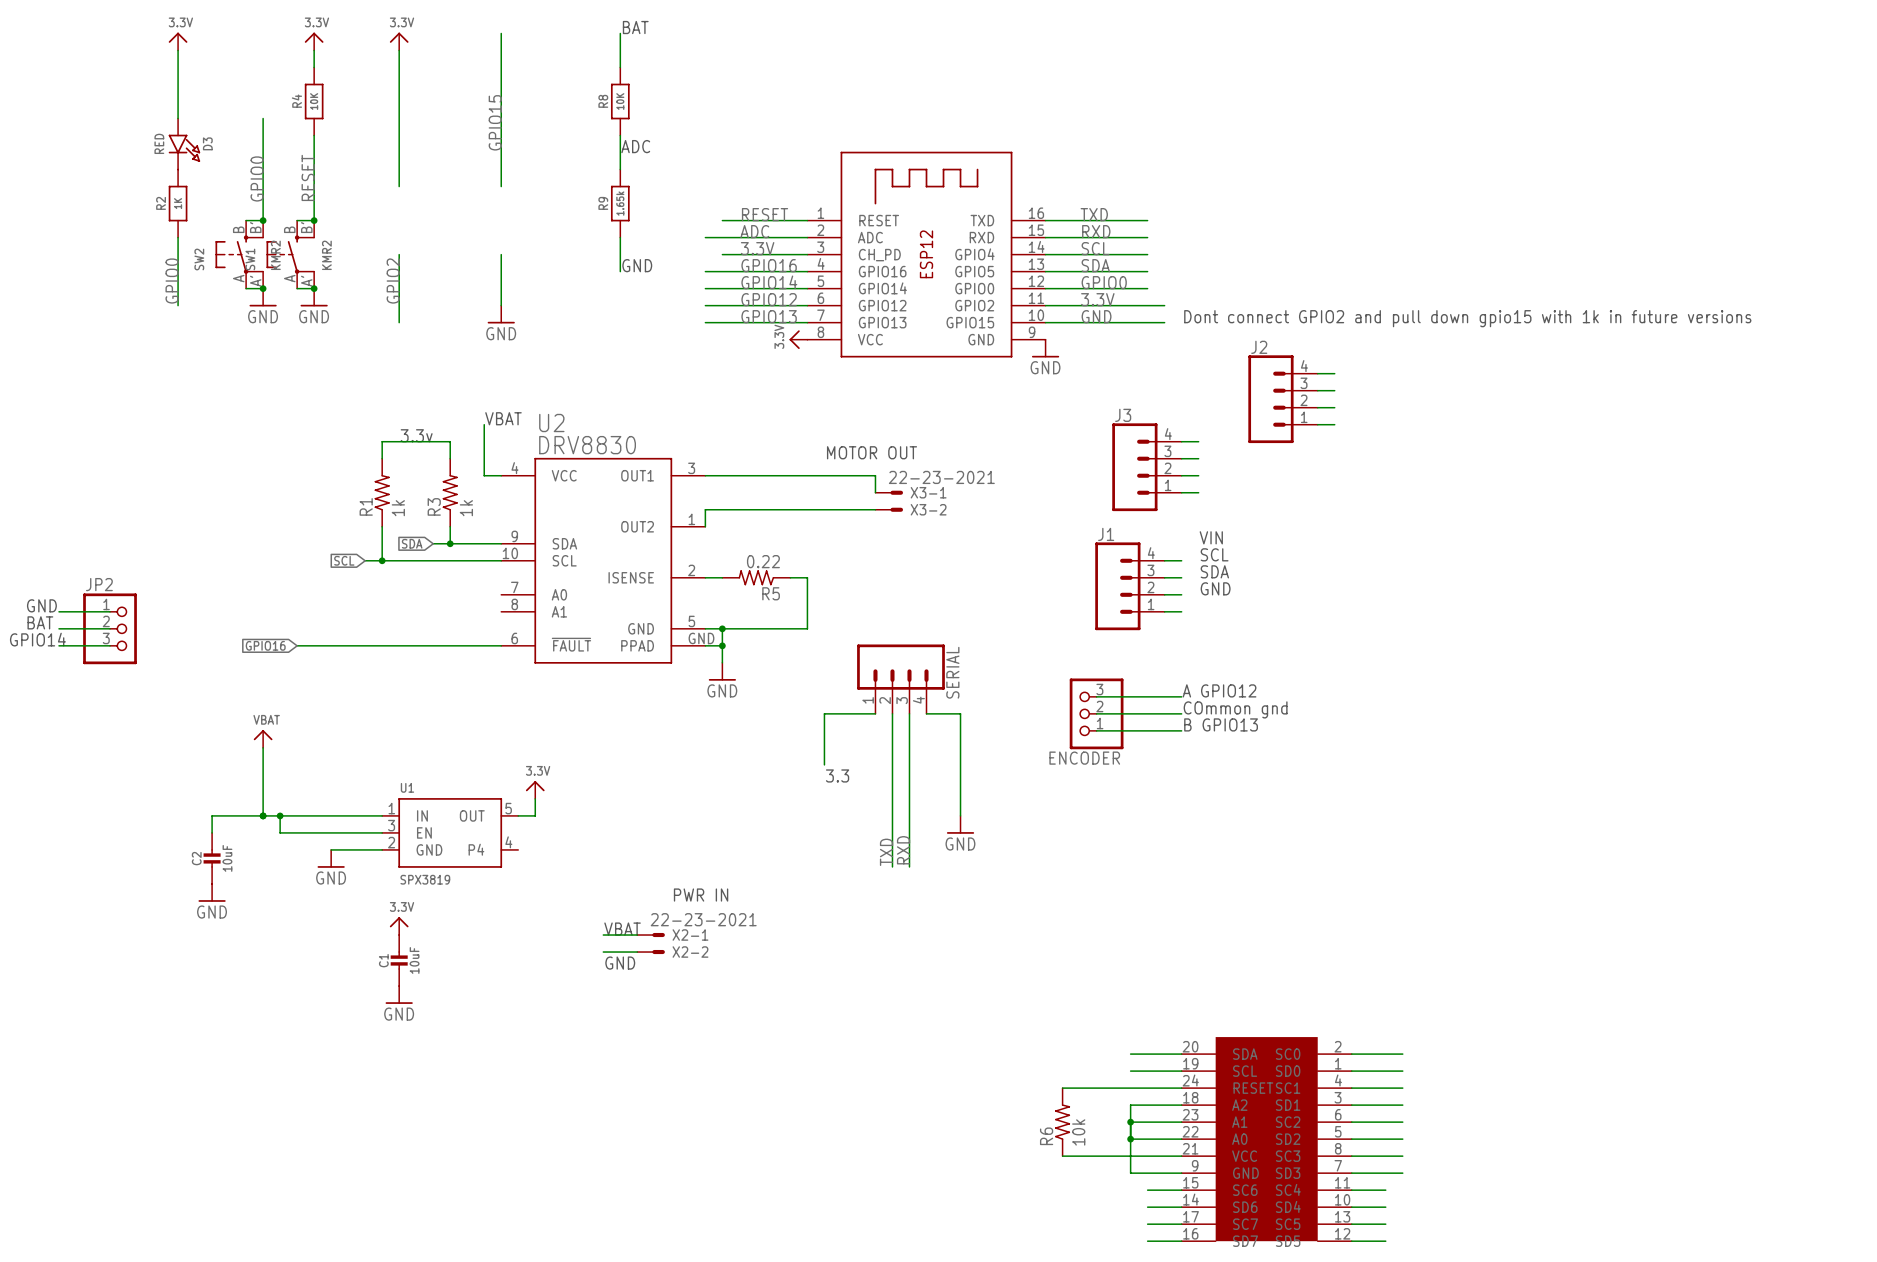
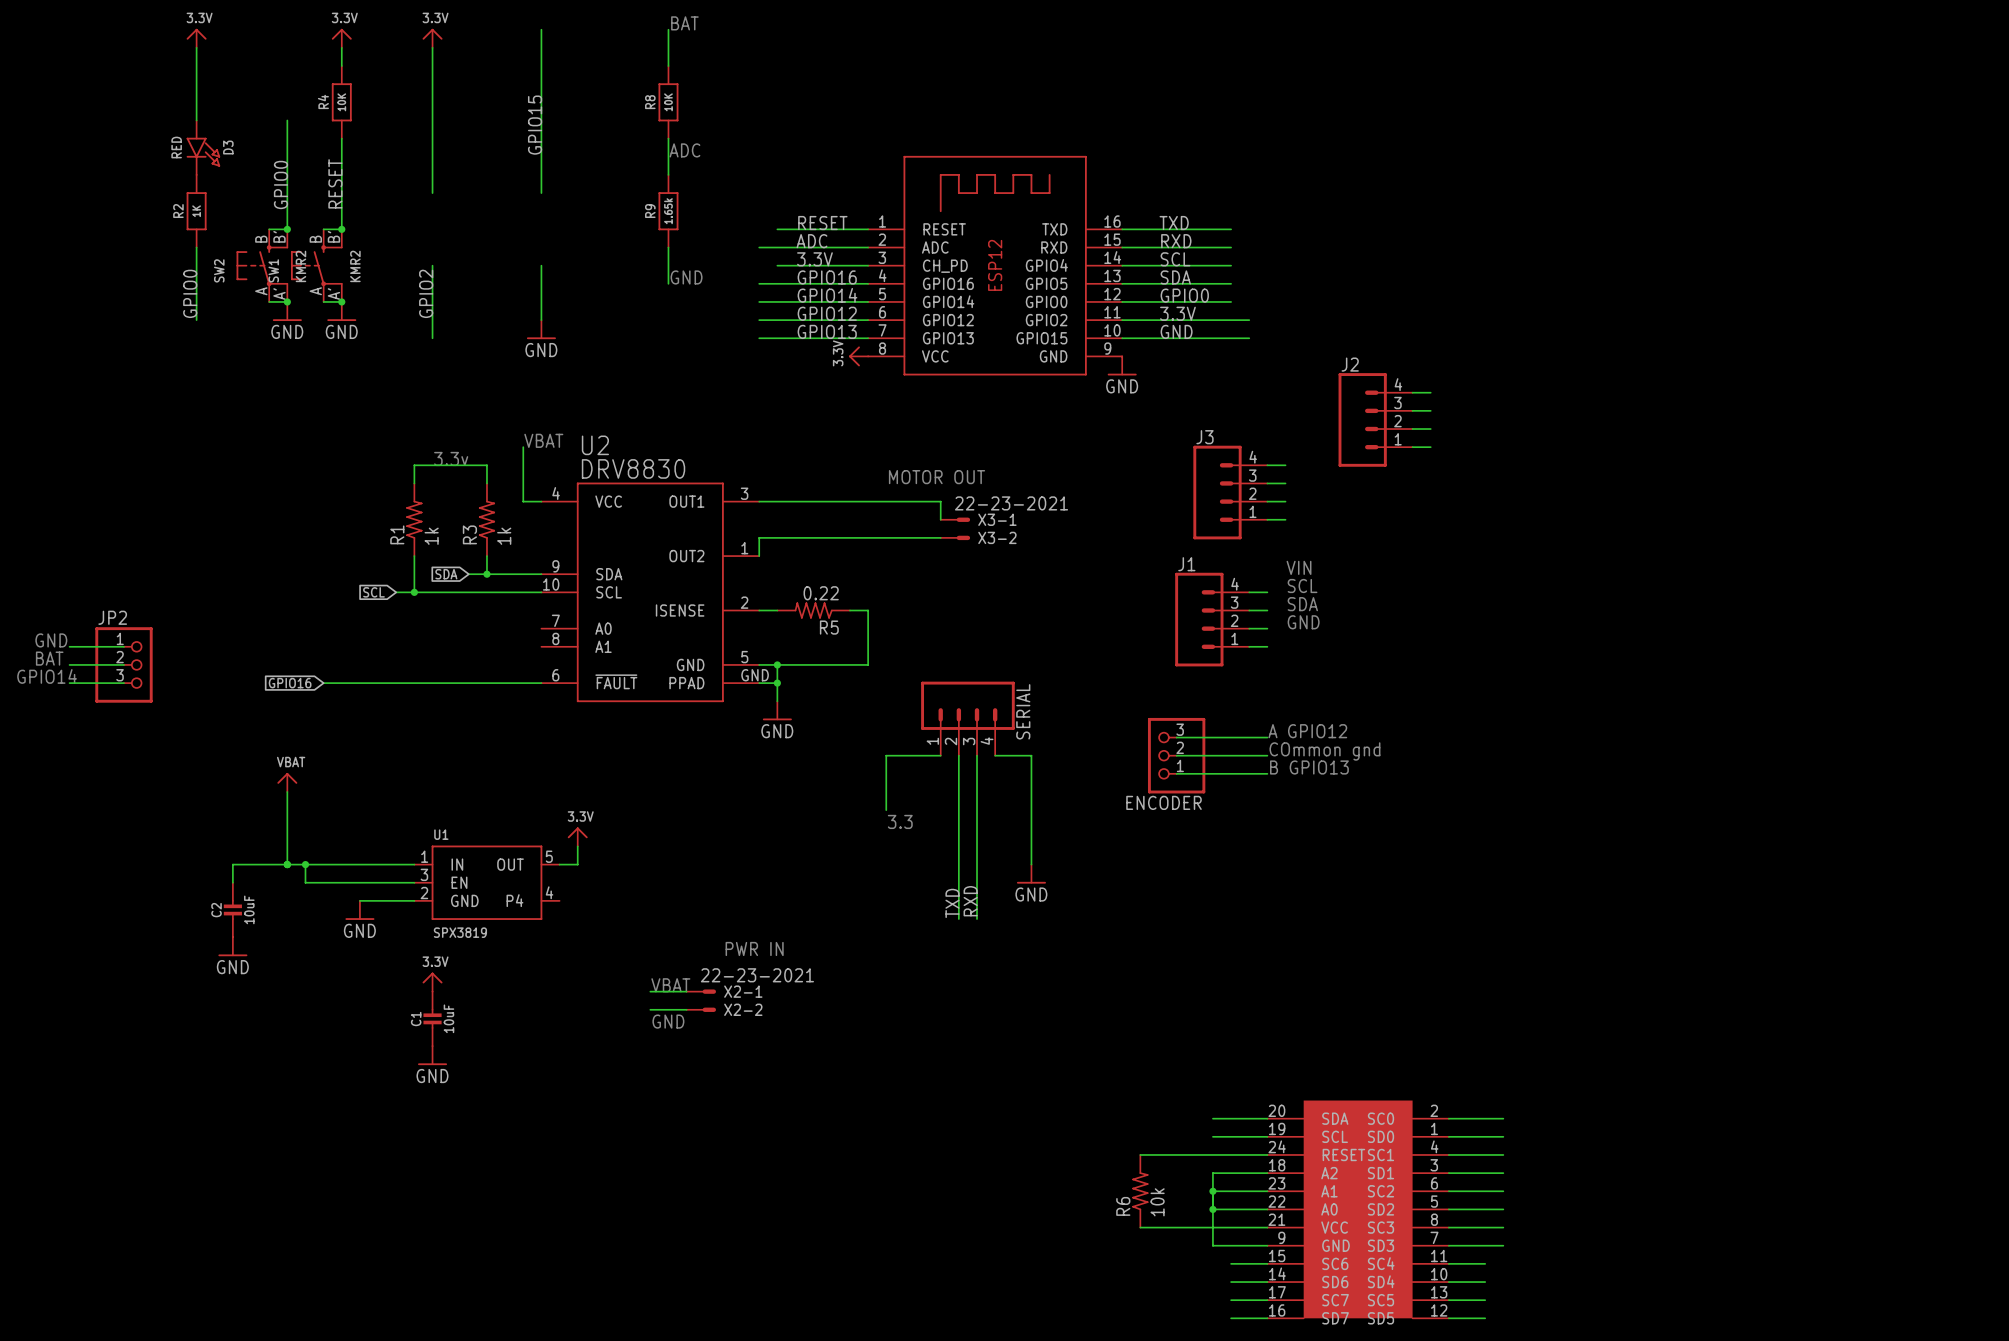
text: Dont connect GPIO2 and pull down gpio15 with 1k in future versions (1467, 318) -> none

